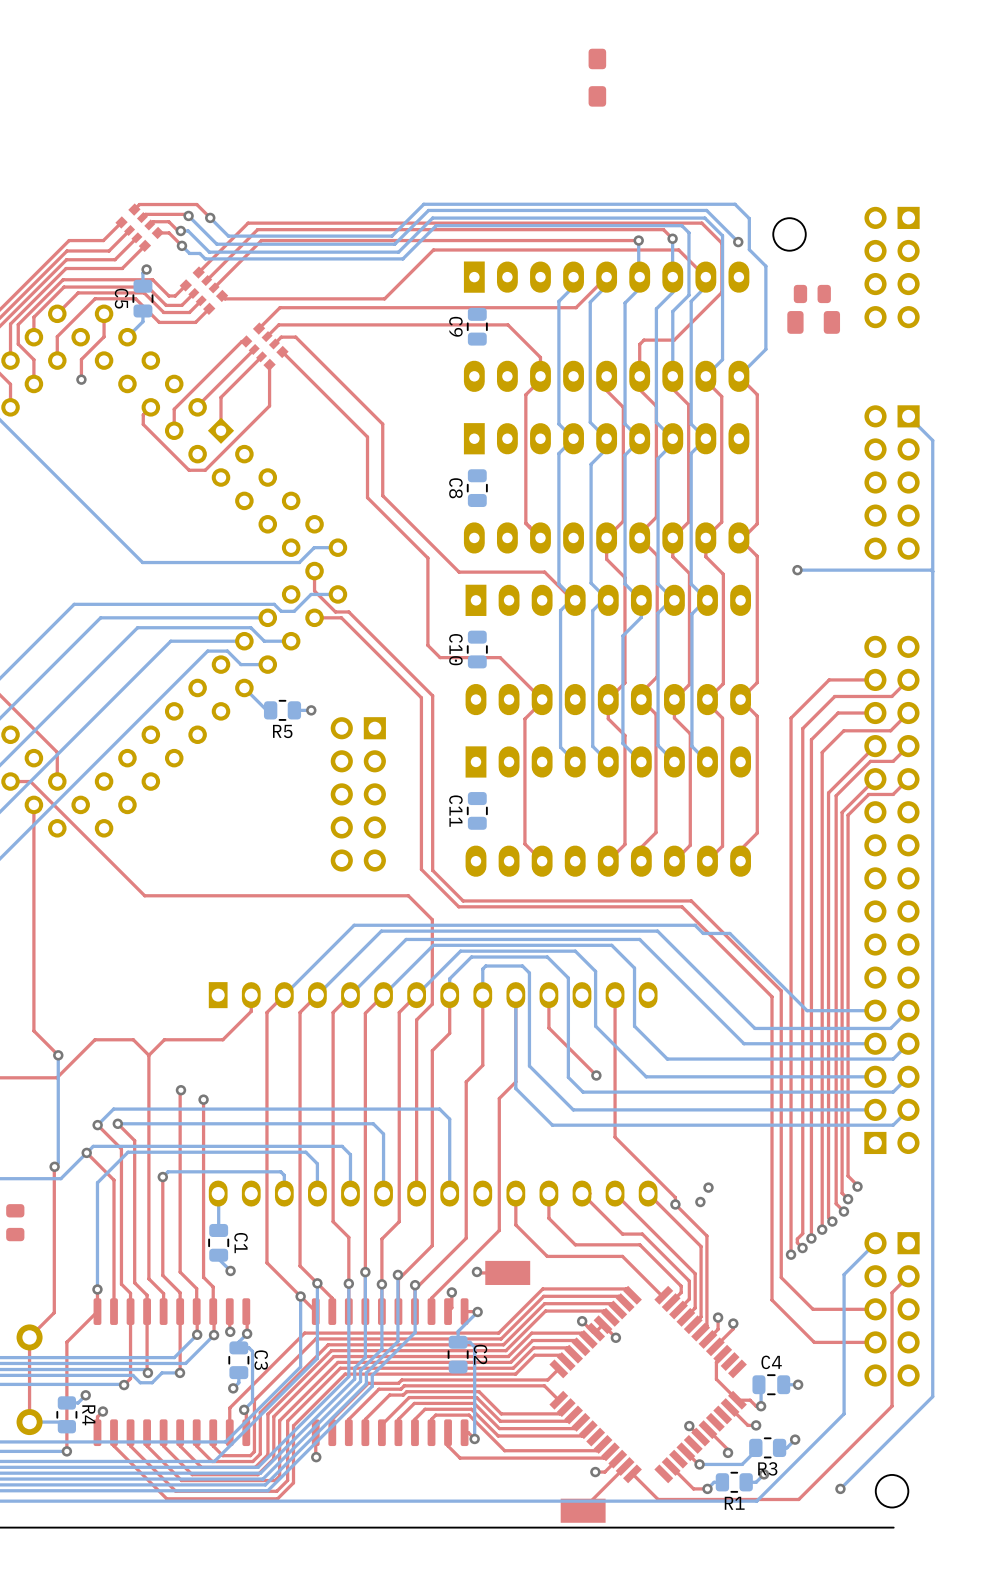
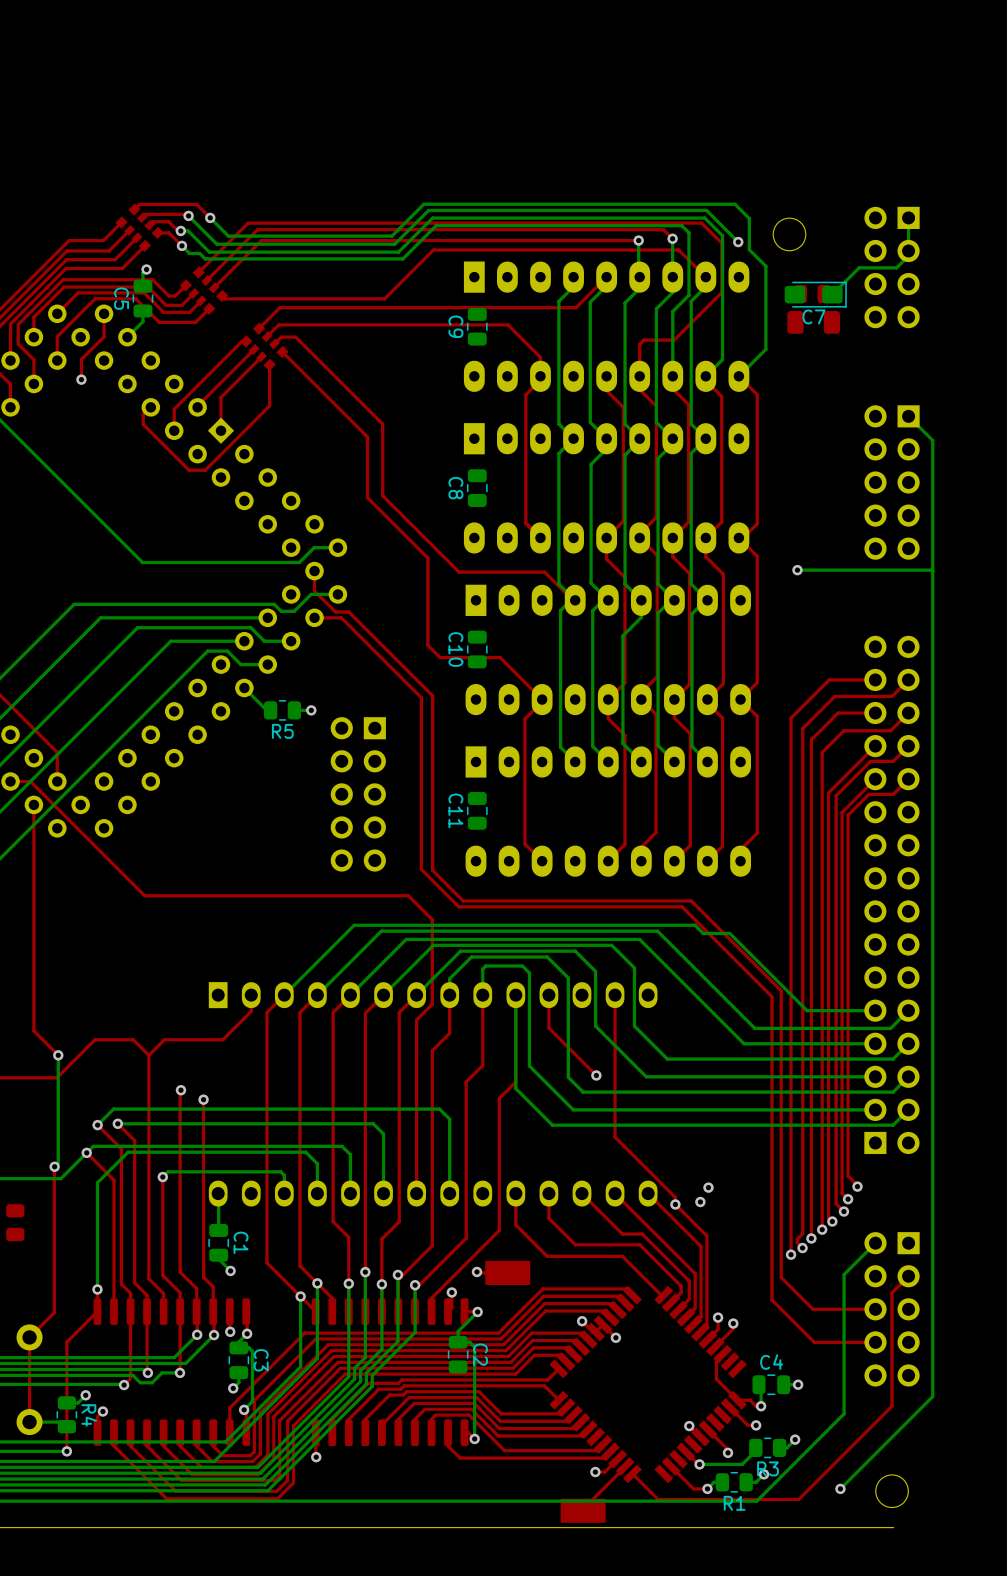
C7 side: top (597, 77) -> bottom (815, 294)
bottom track: none -> (908, 217) (908, 255) (896, 267) (859, 267) (832, 294)

